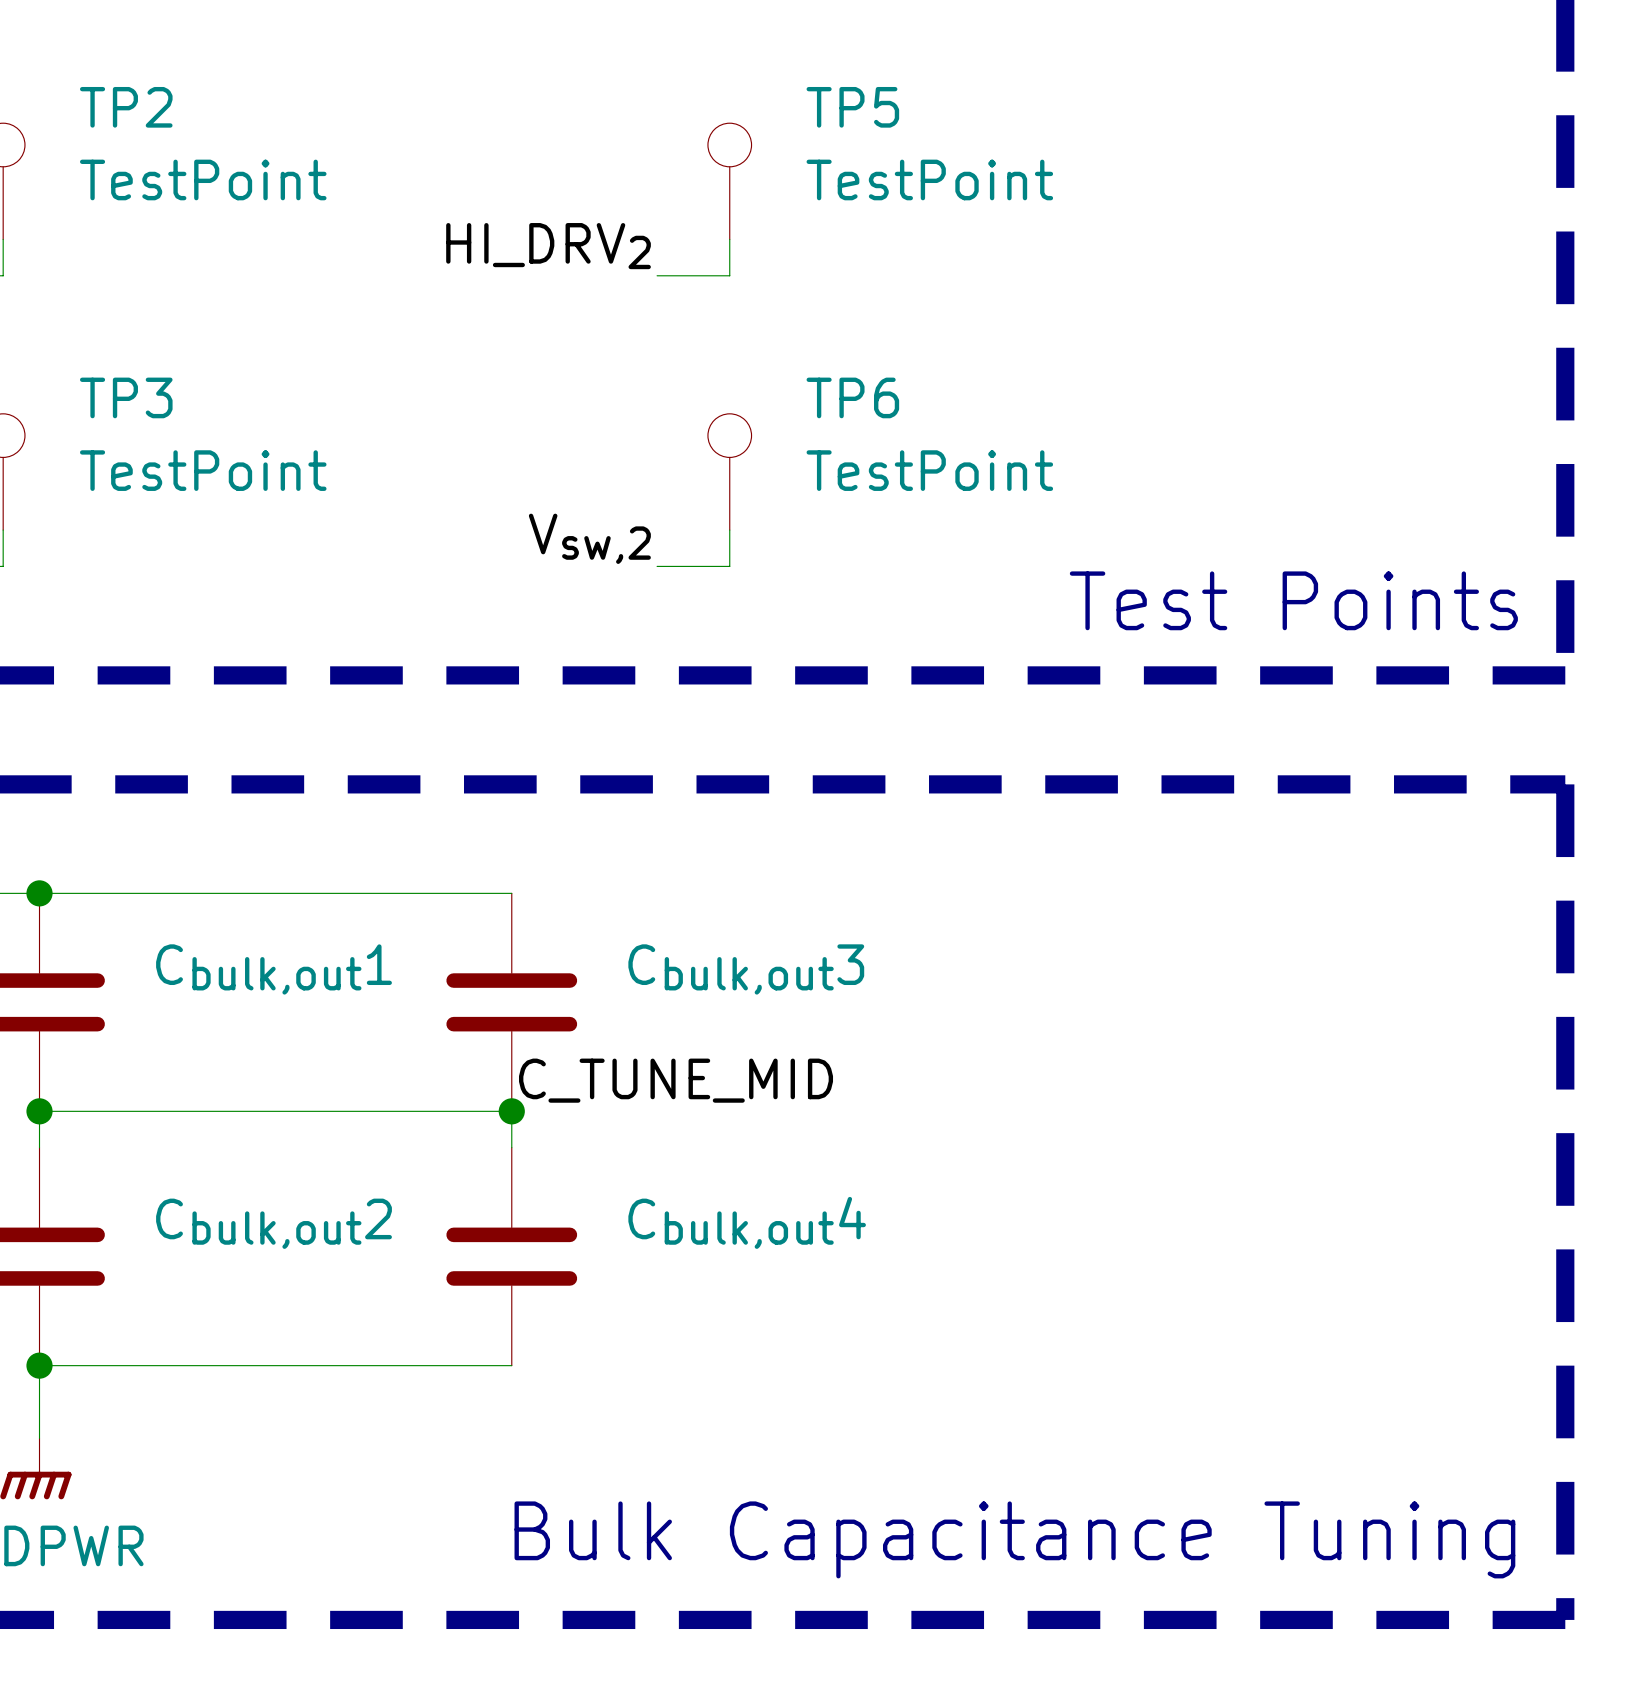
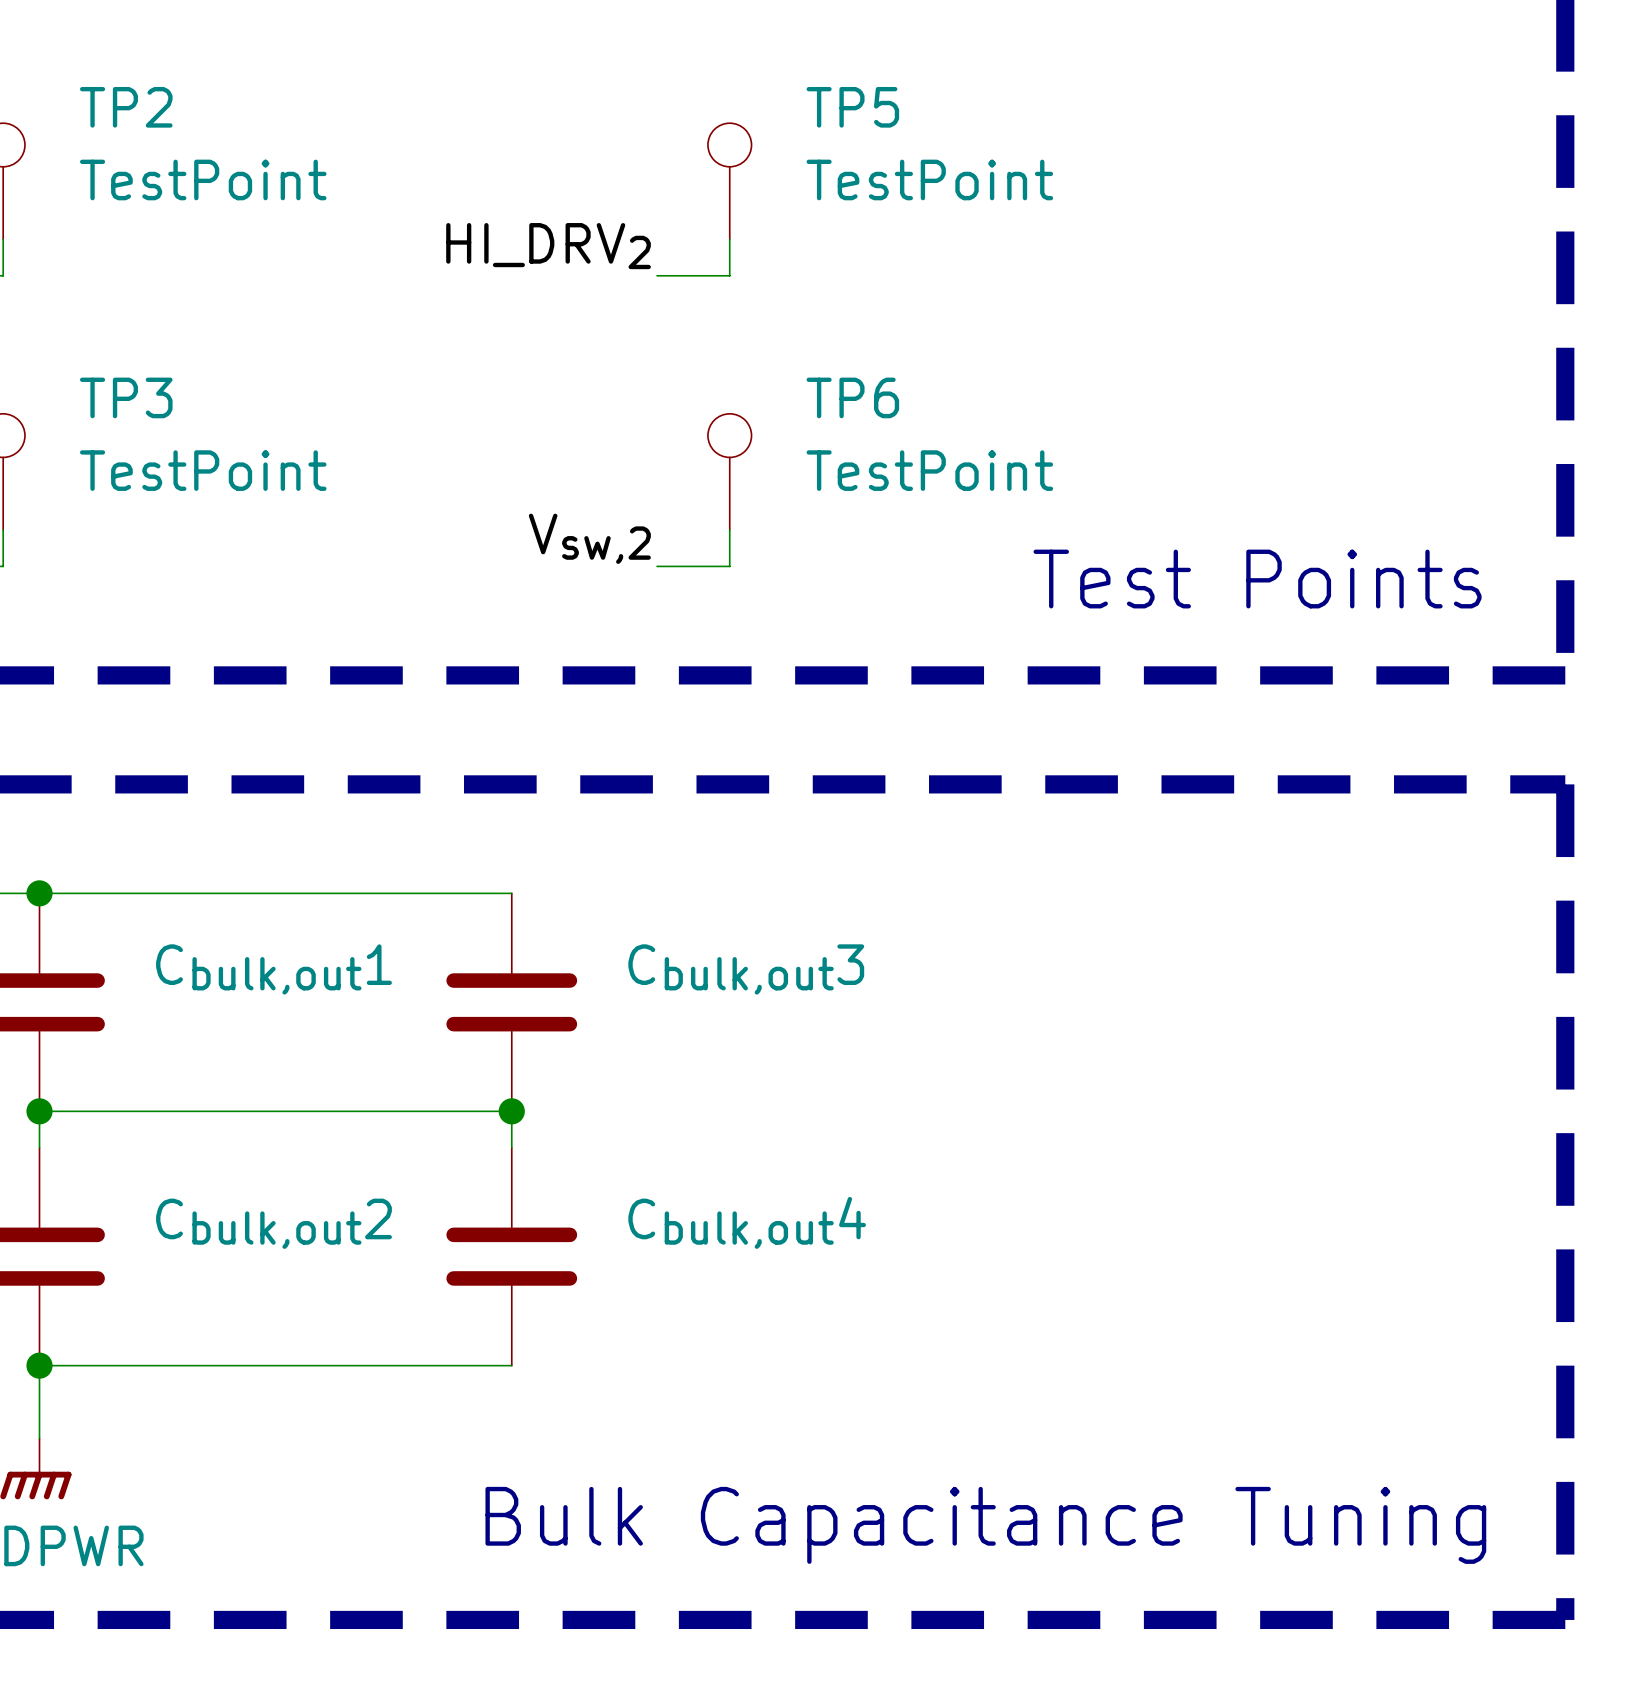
text position: Test Points (1293, 600) -> Test Points (1257, 579)
label: C_TUNE_MID (676, 1080) -> none
text position: Bulk Capacitance Tuning (1014, 1539) -> Bulk Capacitance Tuning (985, 1525)

